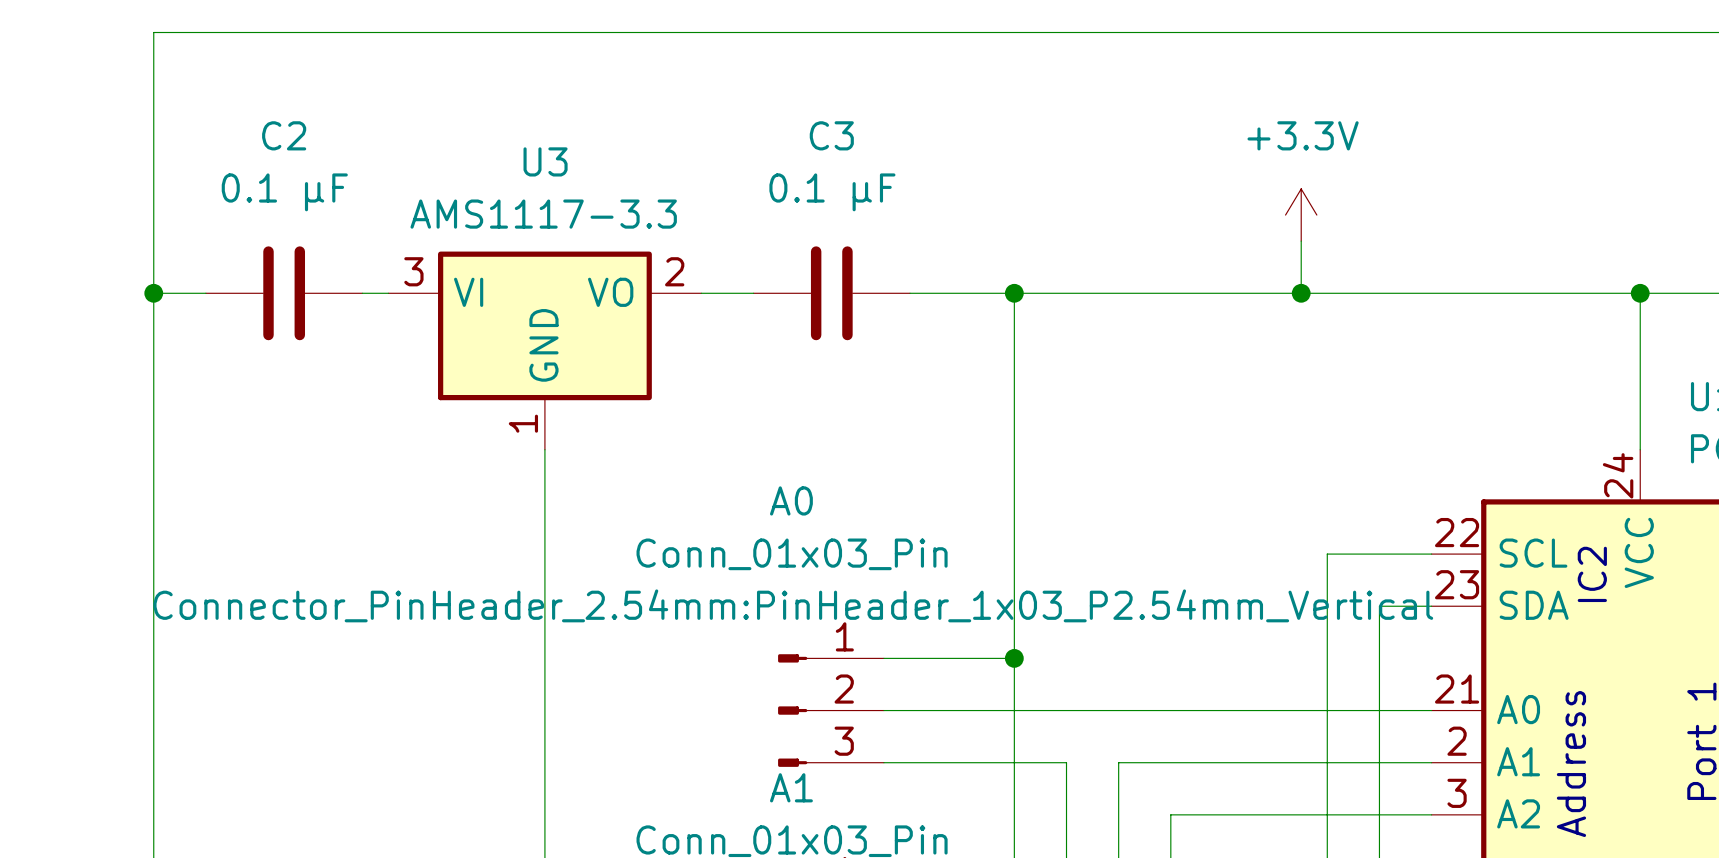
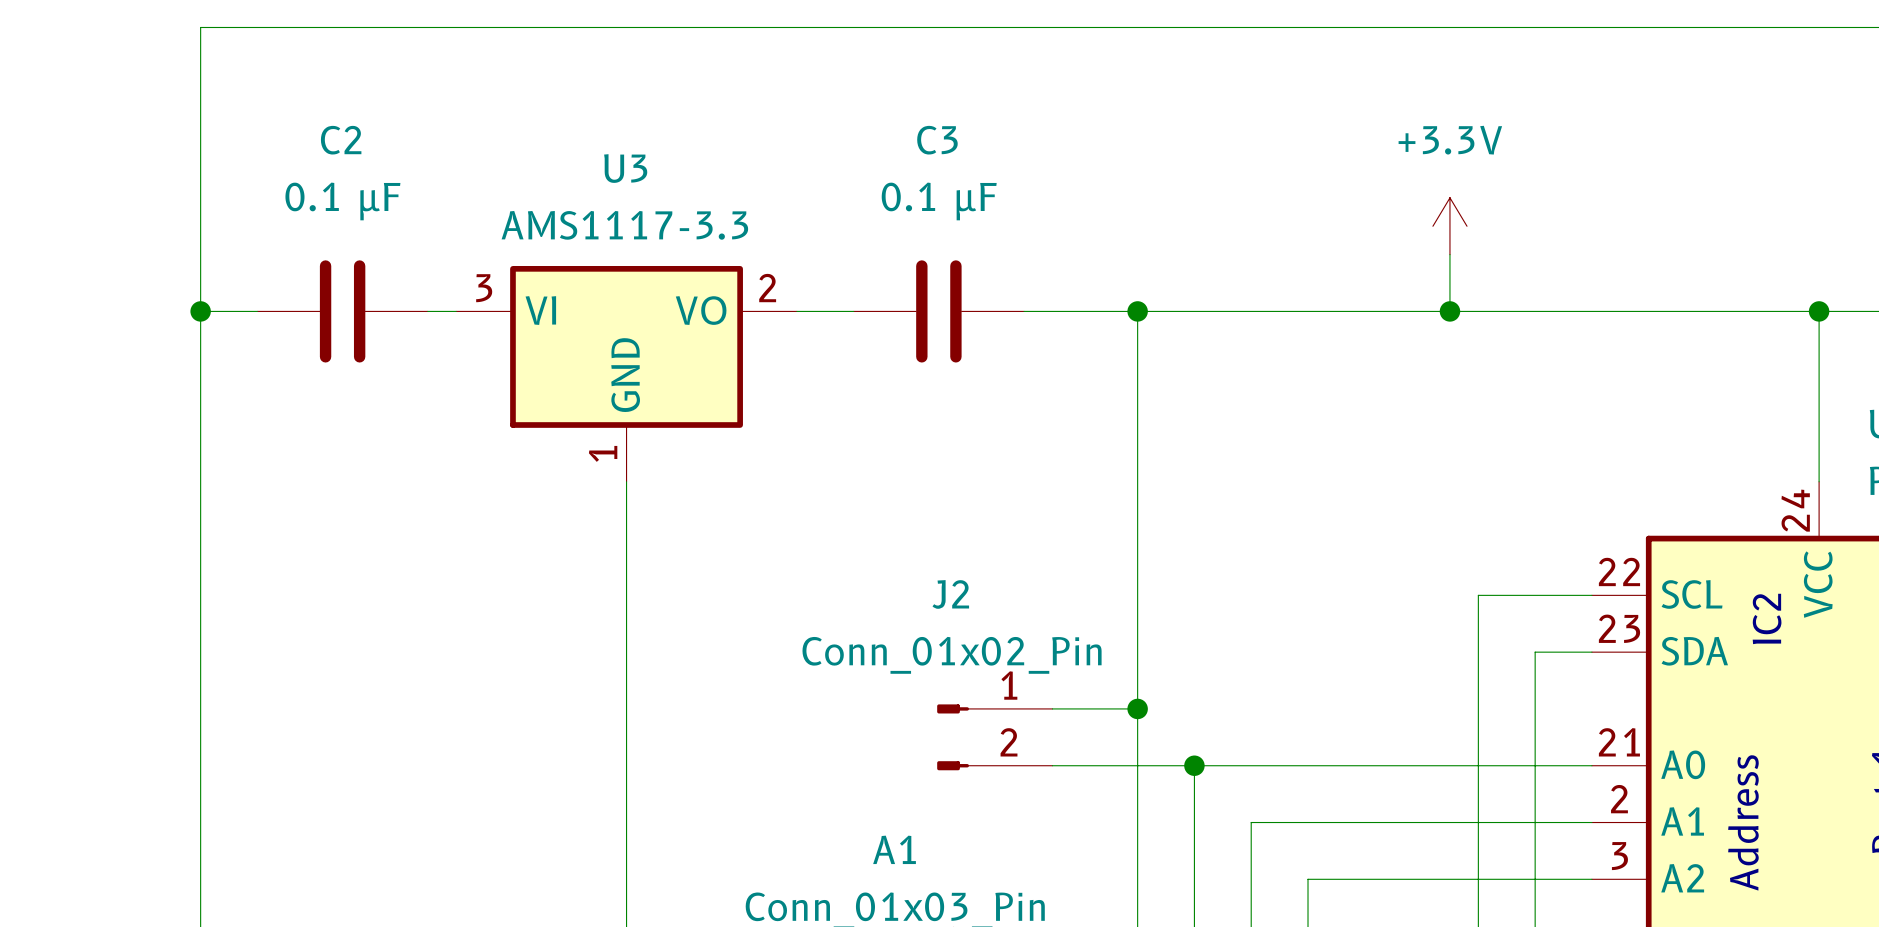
J2: none -> Conn_01x02_Pin (994, 737)
A0: Conn_01x03_Pin (831, 710) -> none
junction: none -> (1194, 765)
wire: (883, 762) (1066, 762) -> (1194, 765) (1194, 822)

